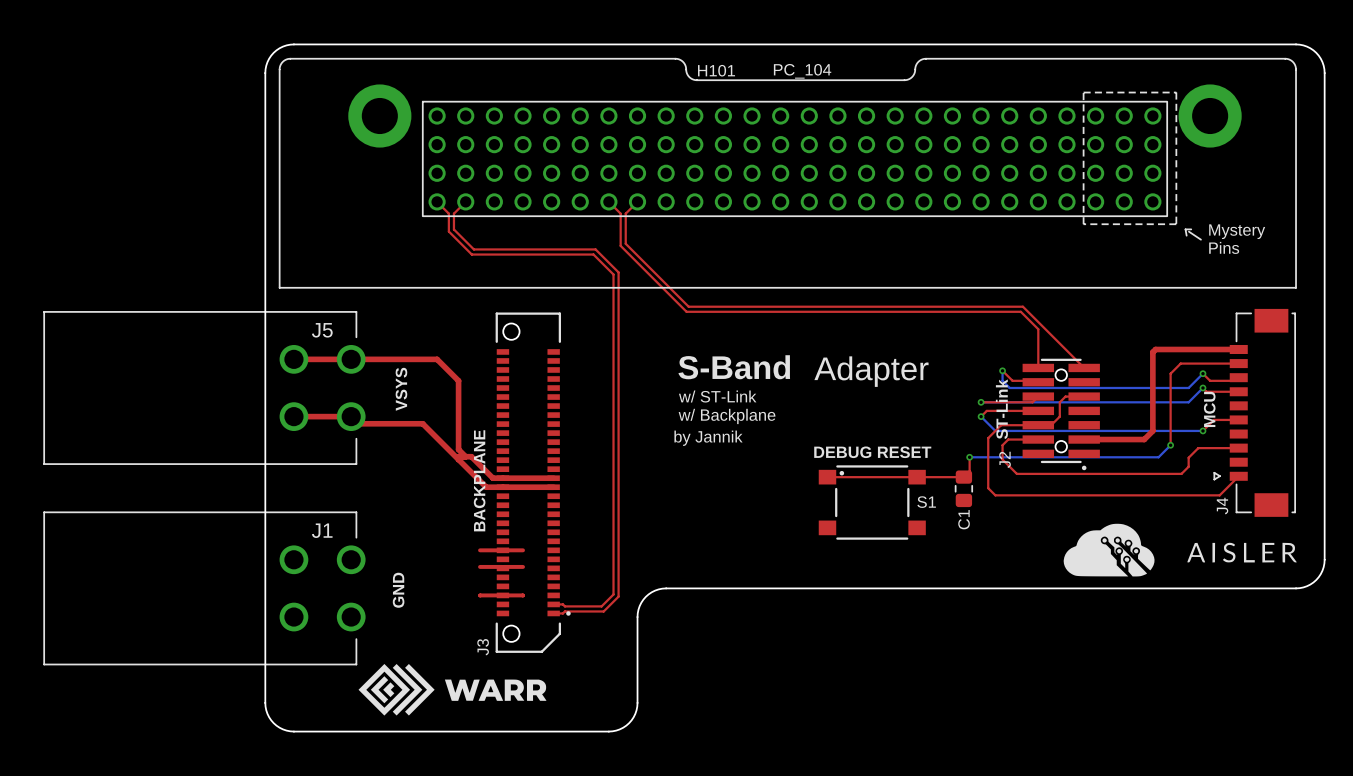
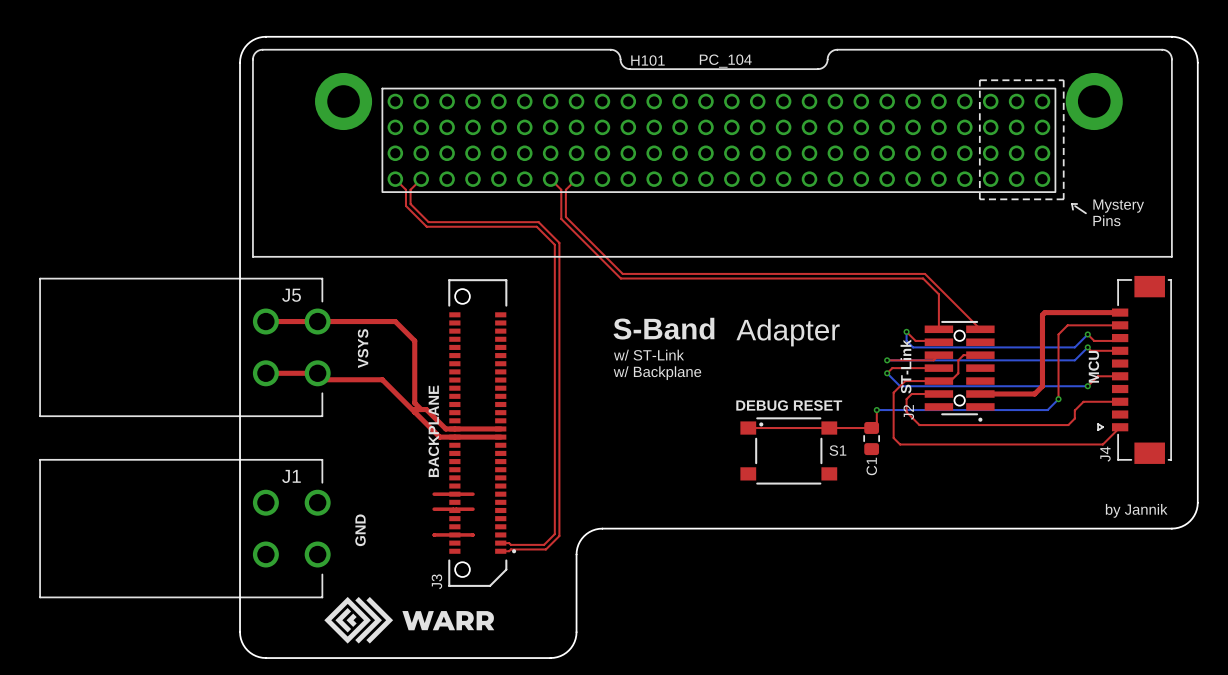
text: by Jannik (708, 438) -> none
drawing: [1063, 523, 1297, 577] -> none
text: none -> by Jannik (1136, 510)

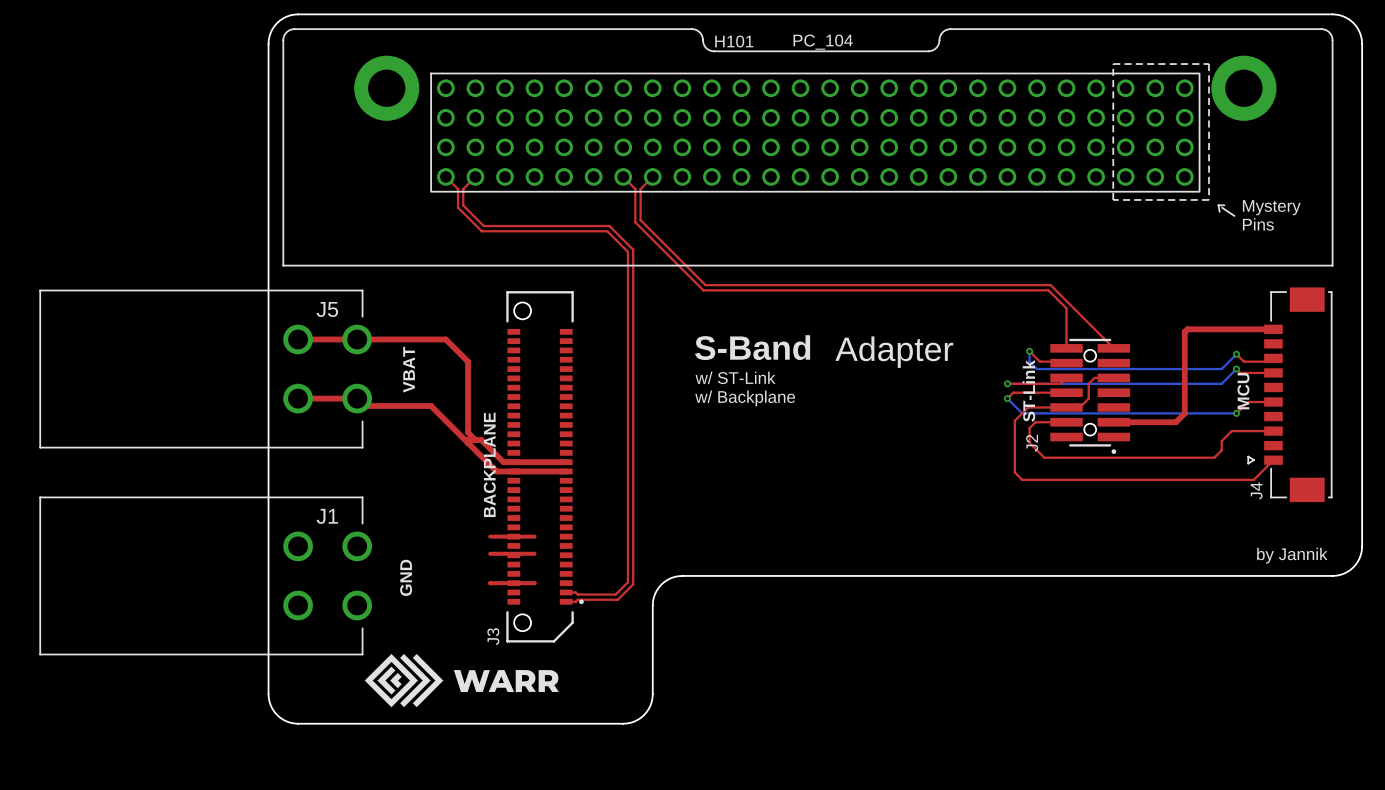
top track: (1120, 325) (1067, 325) (1058, 334) (1058, 399) -> none
text: VSYS (363, 348) -> VBAT (409, 369)
bottom track: (1058, 399) (1047, 410) (876, 410) -> none
via: (1058, 399) -> none
text: DEBUG RESET (789, 405) -> none
top track: (876, 410) (876, 422) (871, 428) (748, 428) -> none
via: (876, 410) -> none
C1: (871, 438) -> none
S1: (788, 450) -> none

